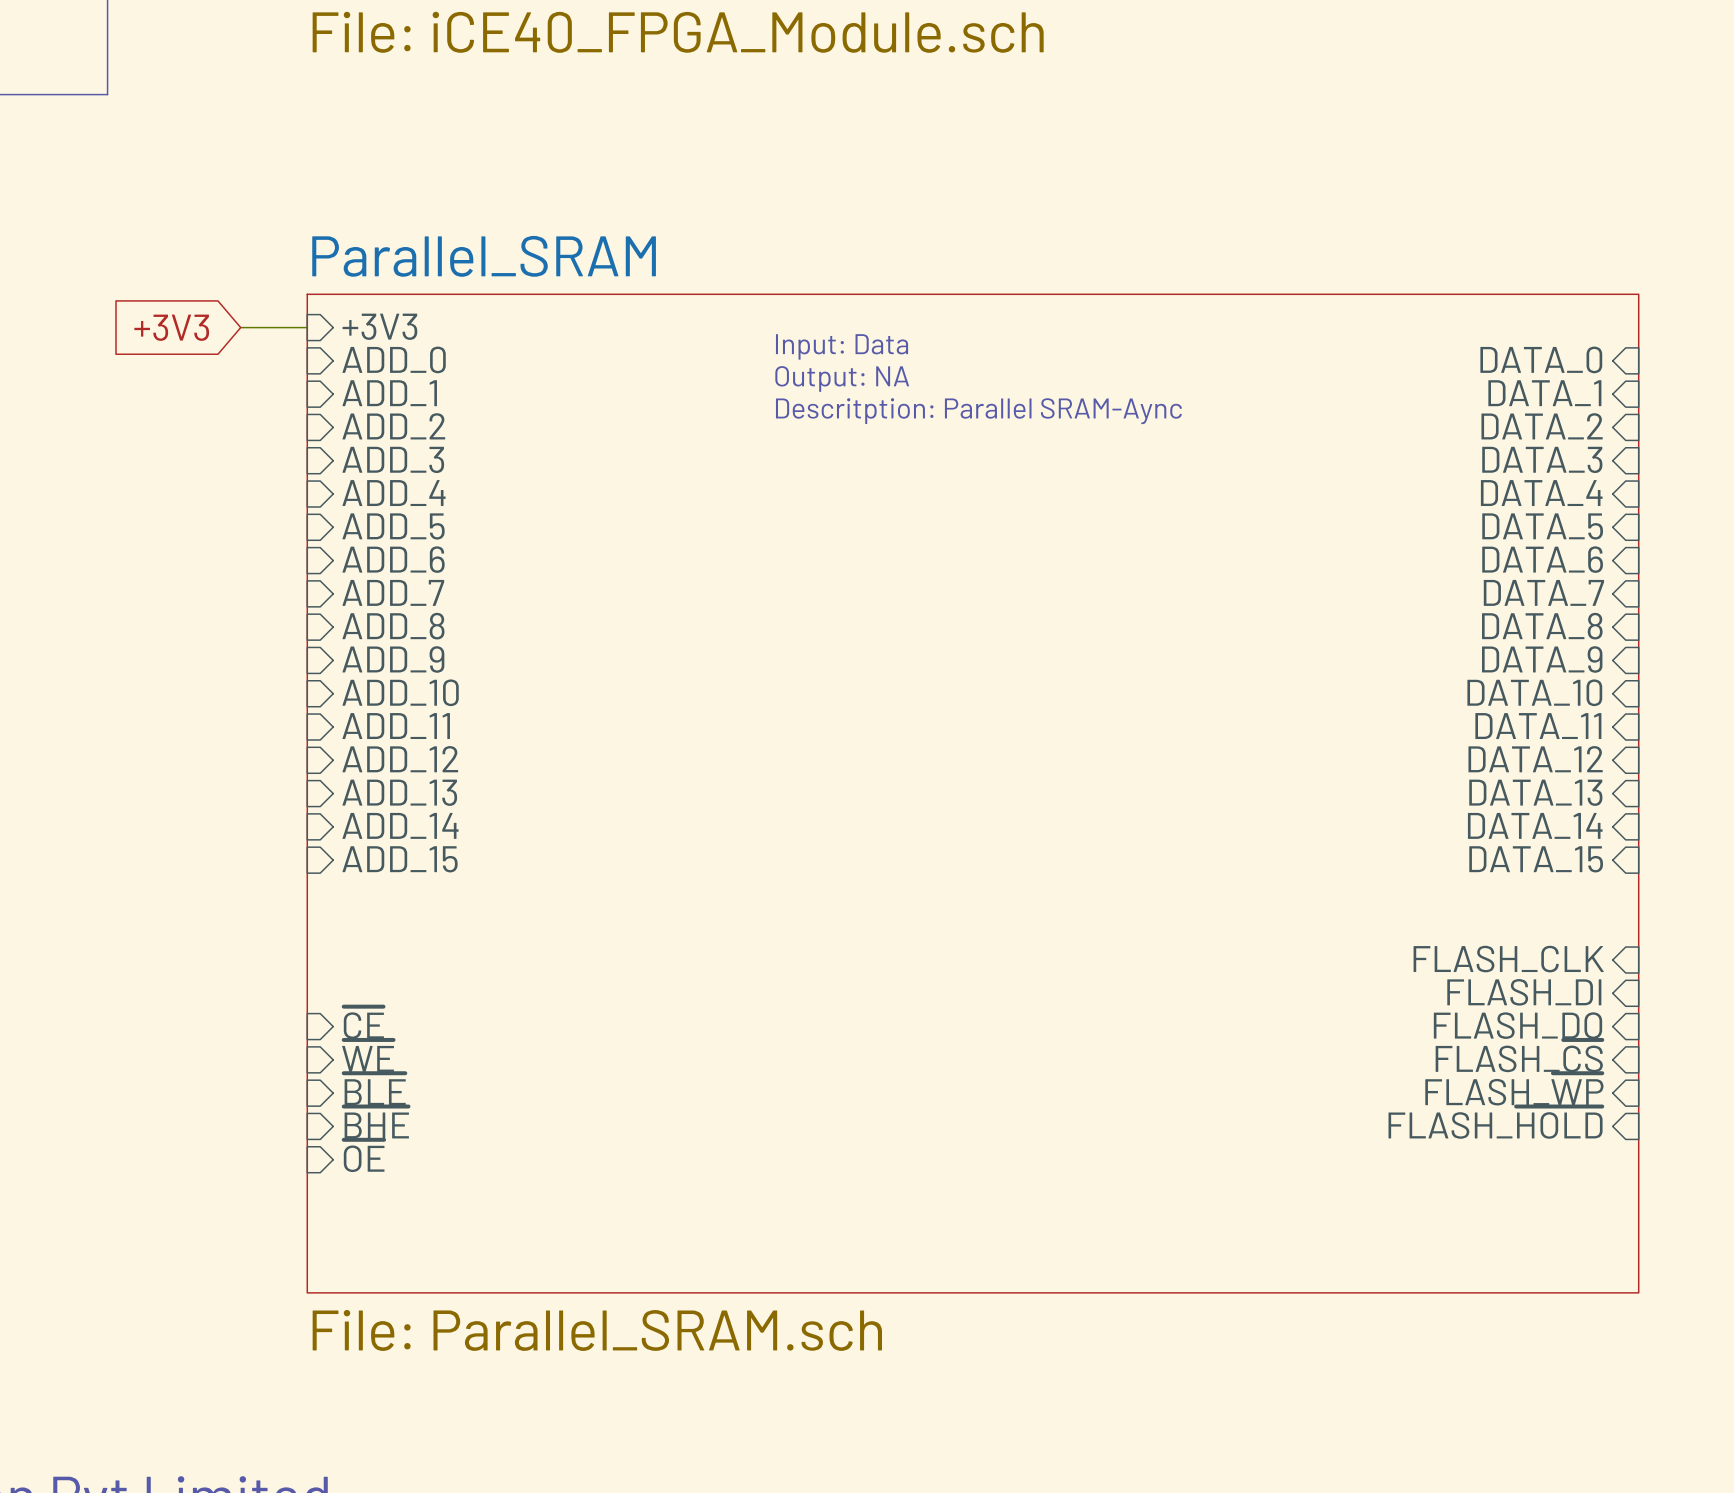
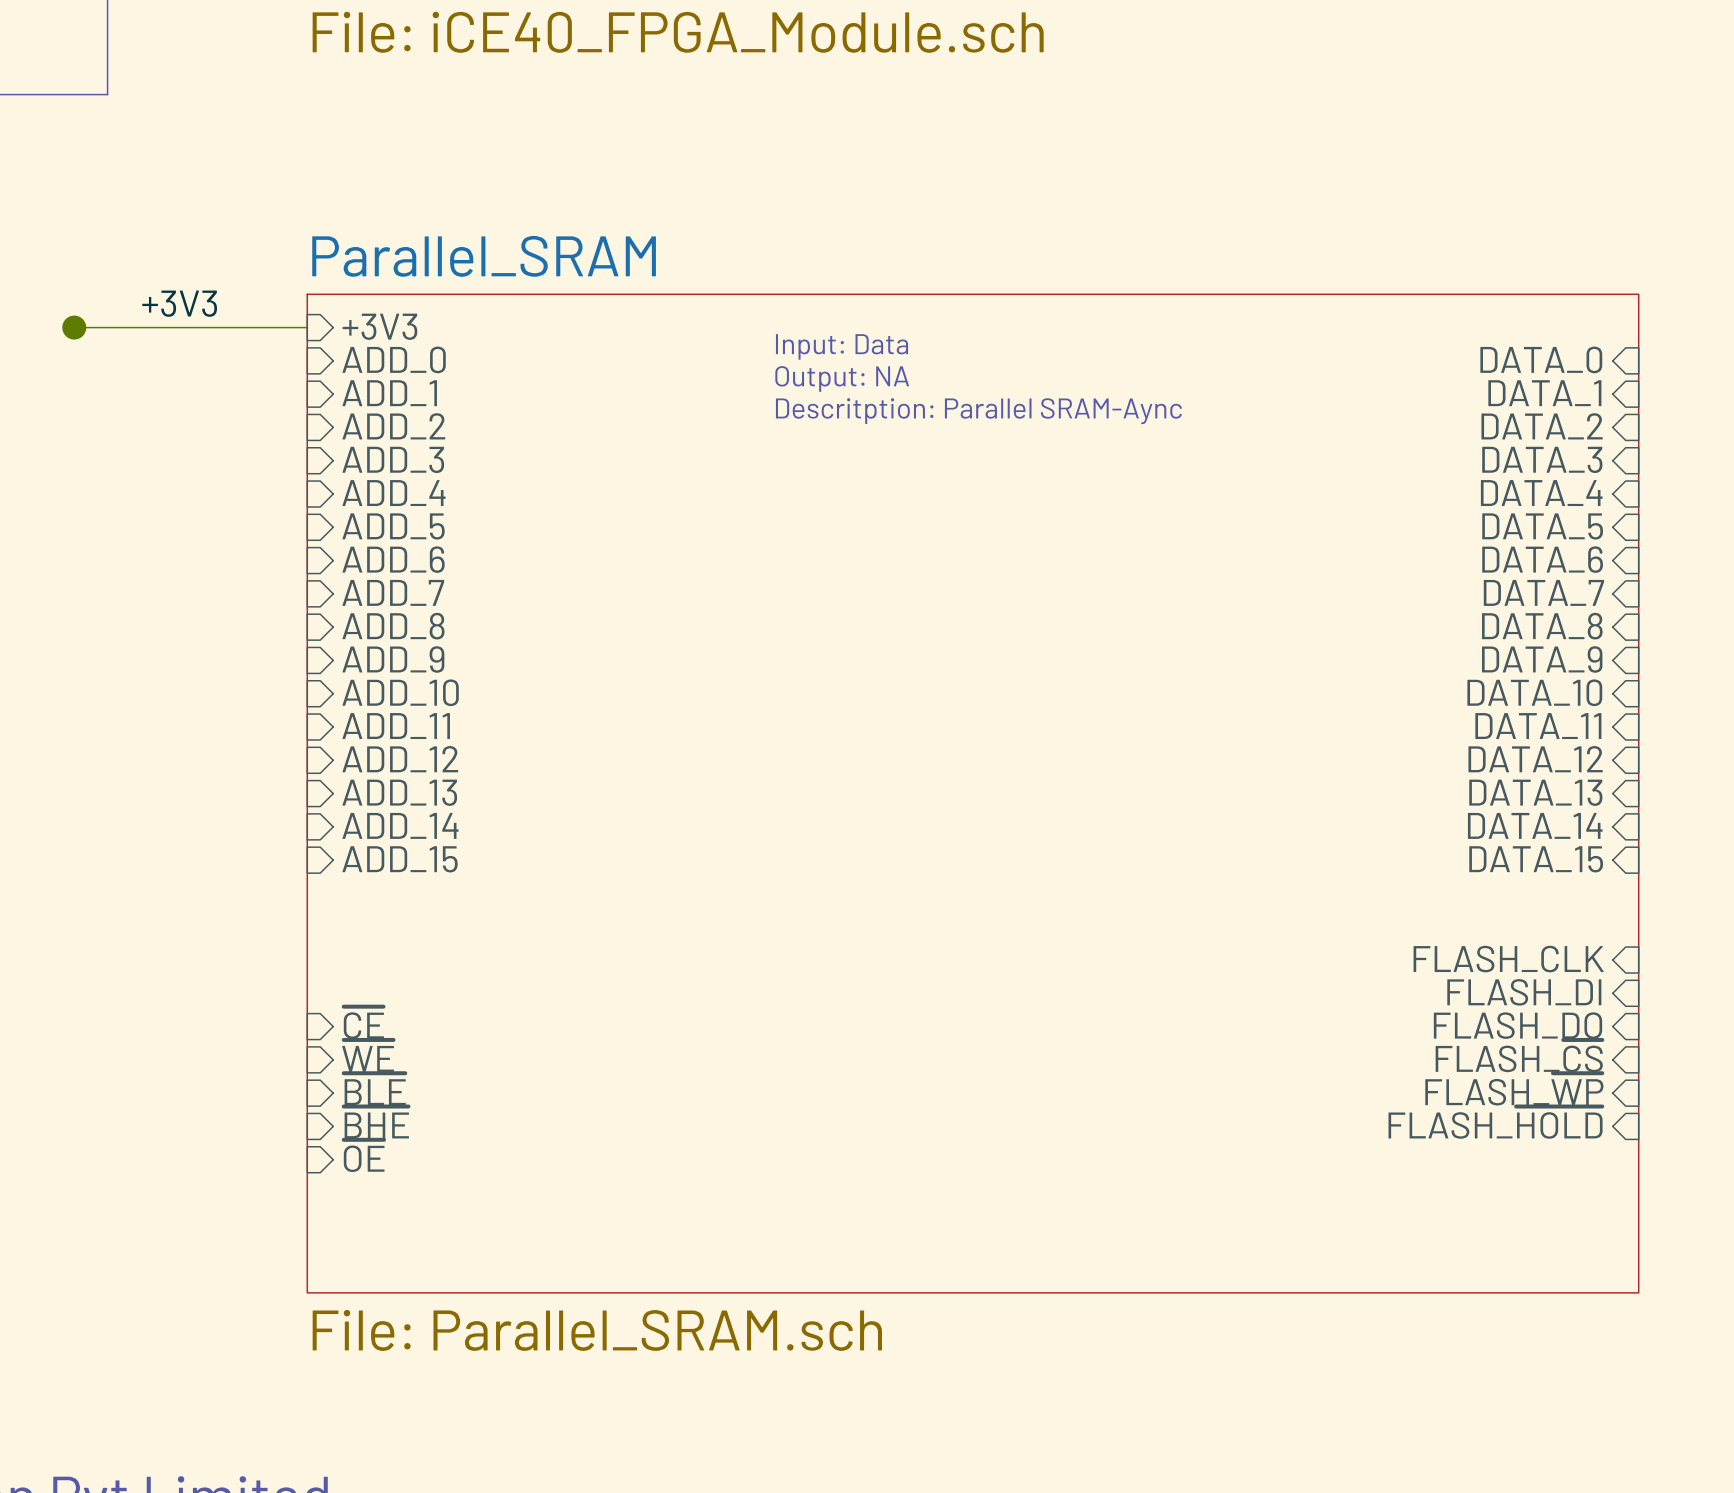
label: none -> +3V3 (179, 303)
wire: none -> (74, 327) (240, 327)
junction: none -> (74, 327)
global label: +3V3 (171, 327) -> none

